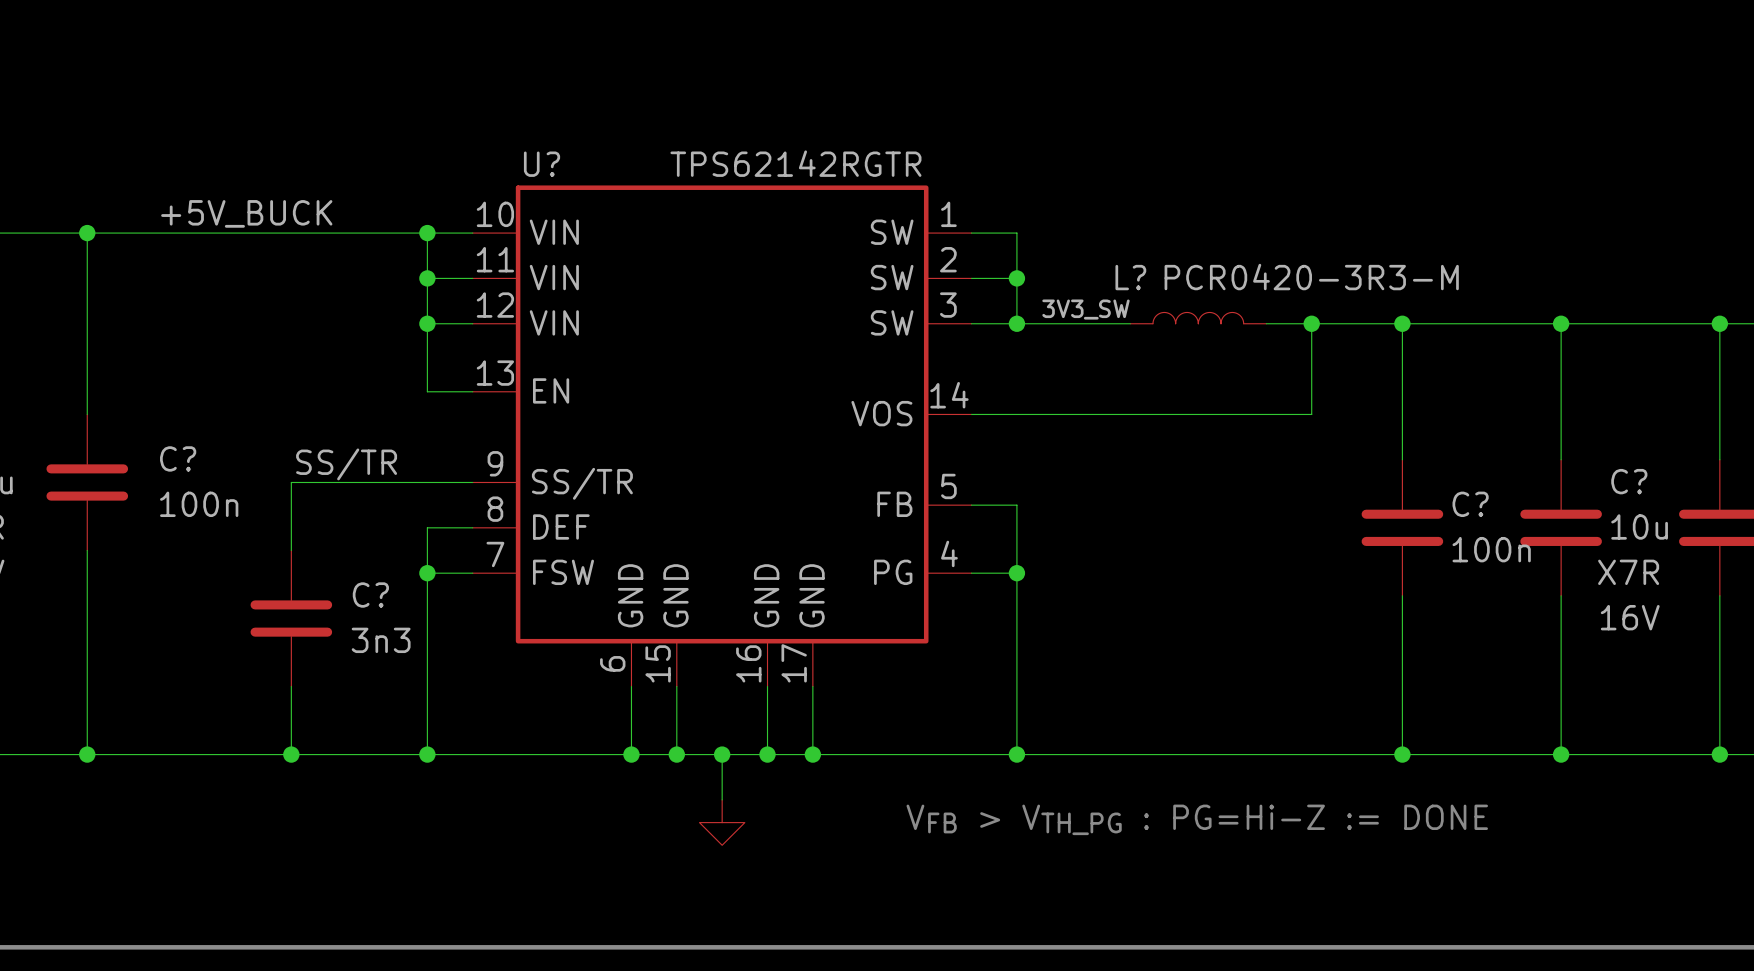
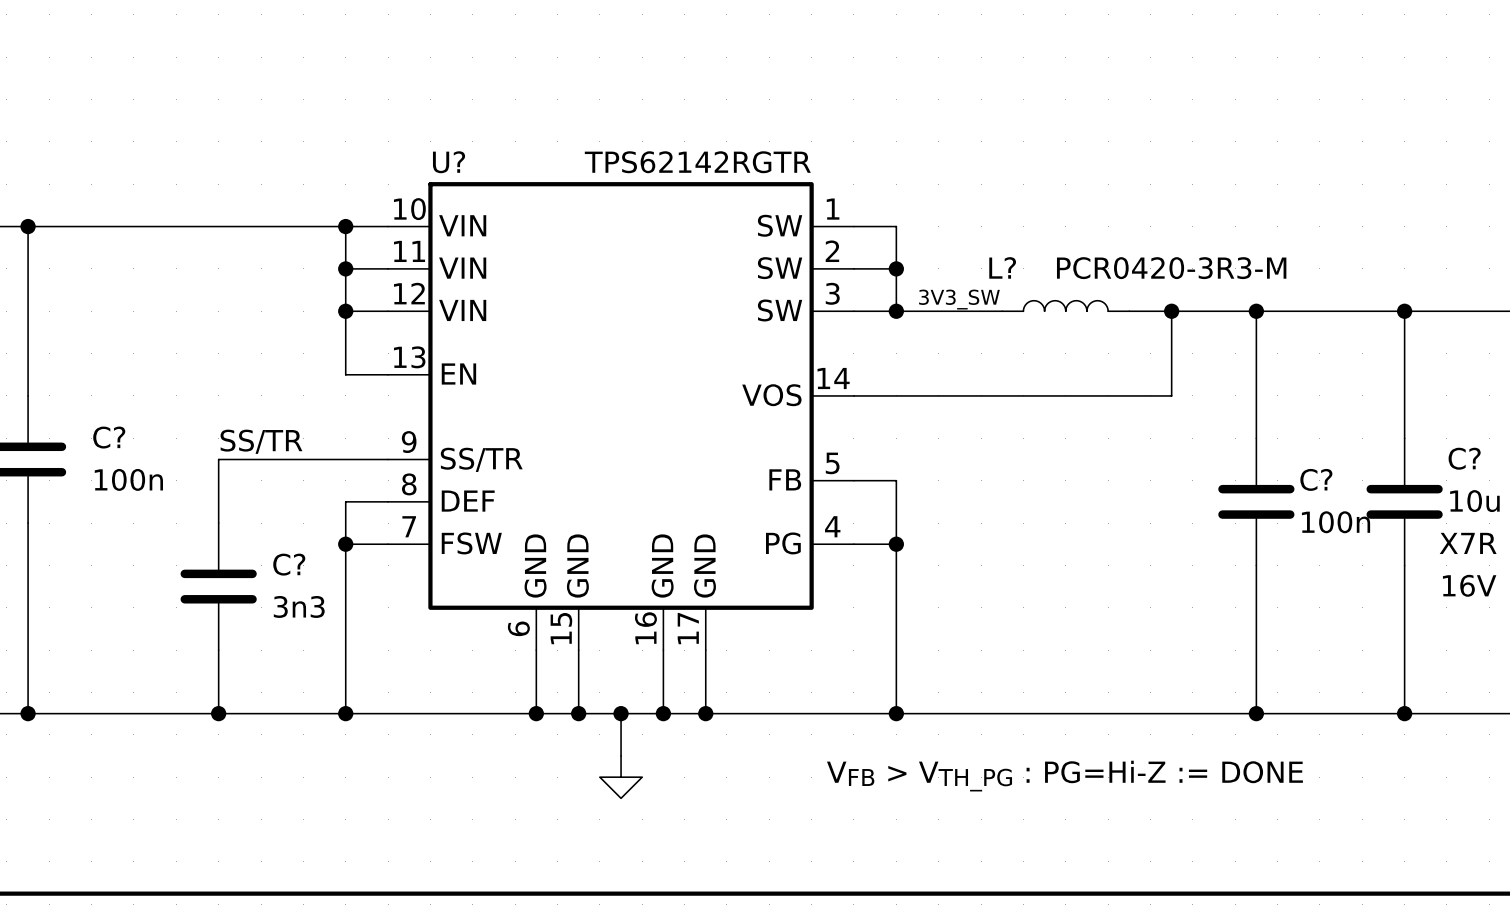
label: +5V_BUCK (246, 213) -> none

